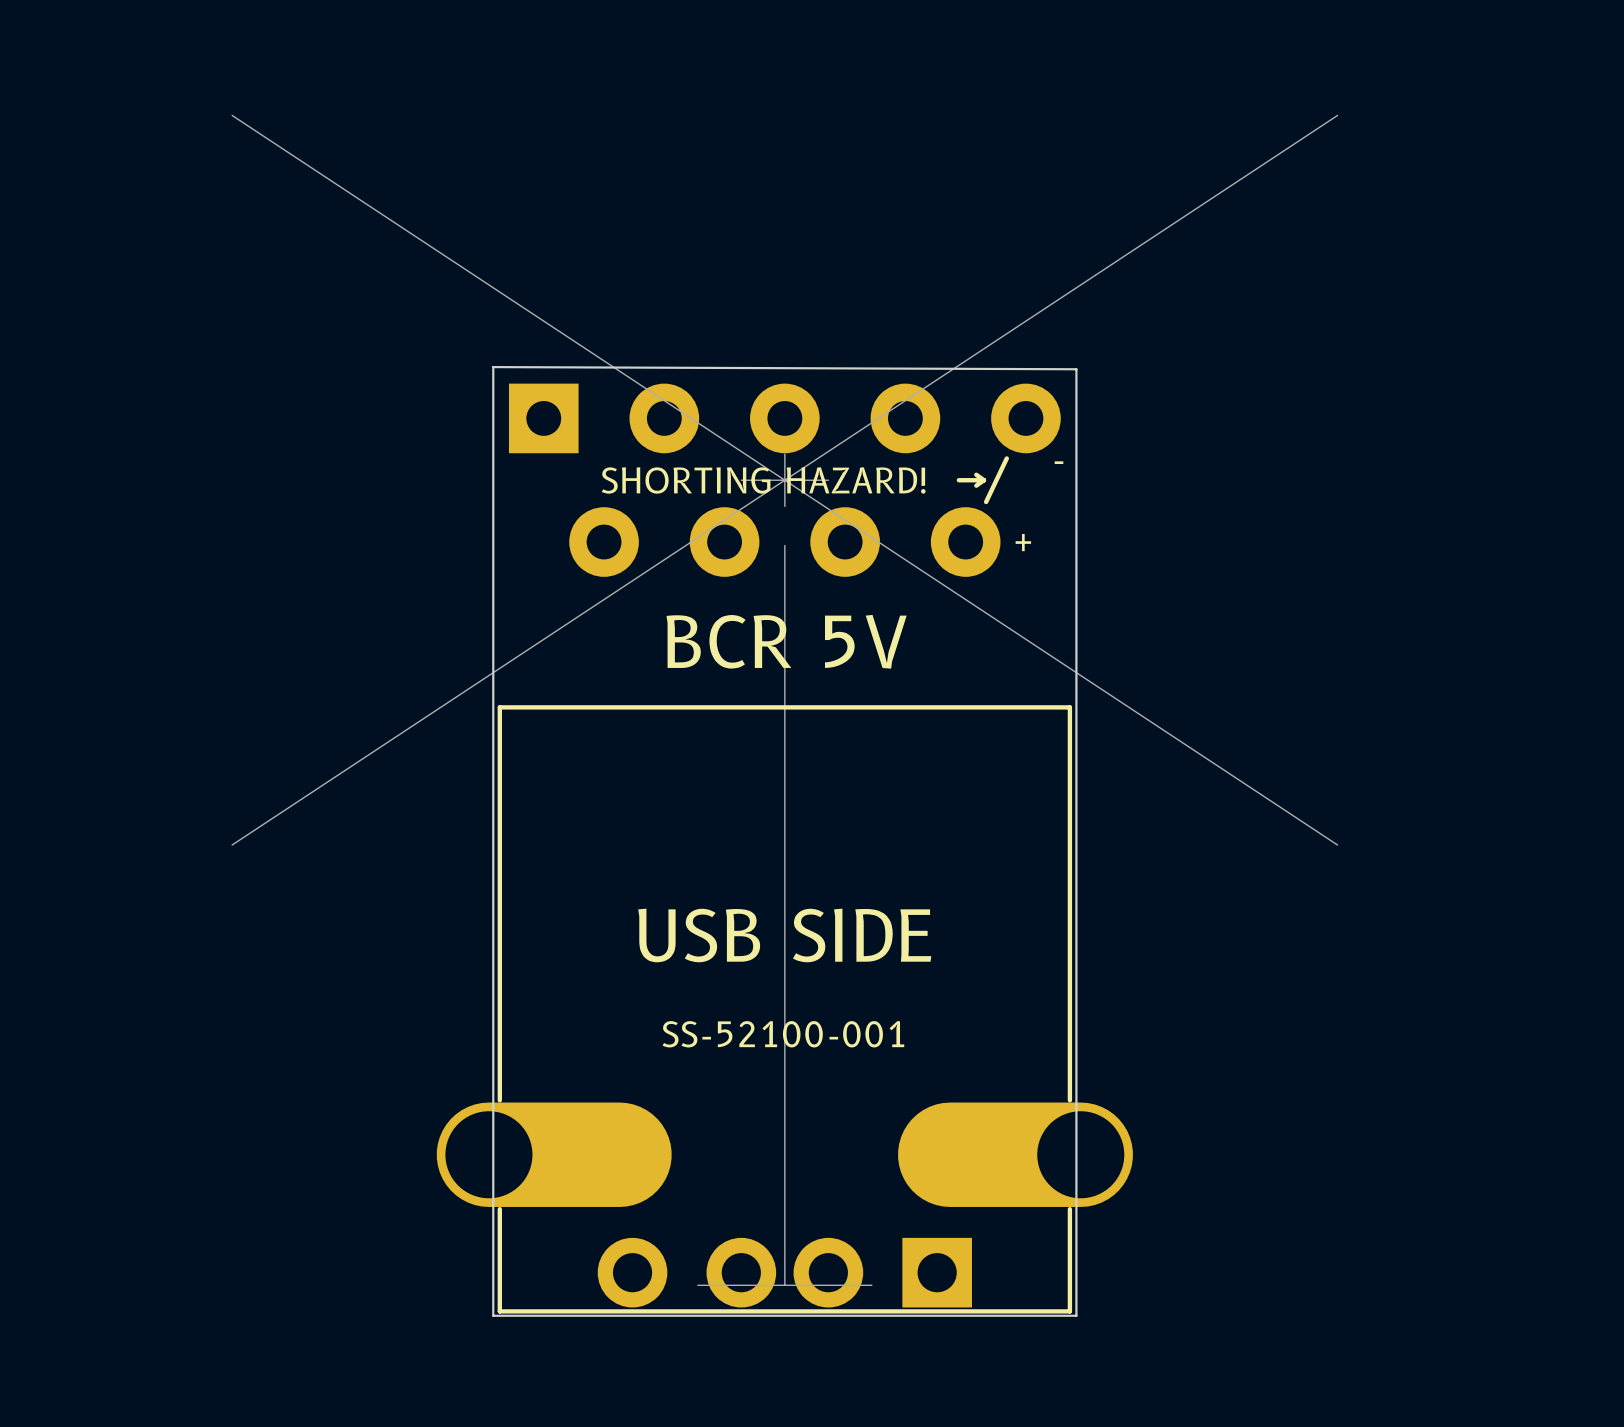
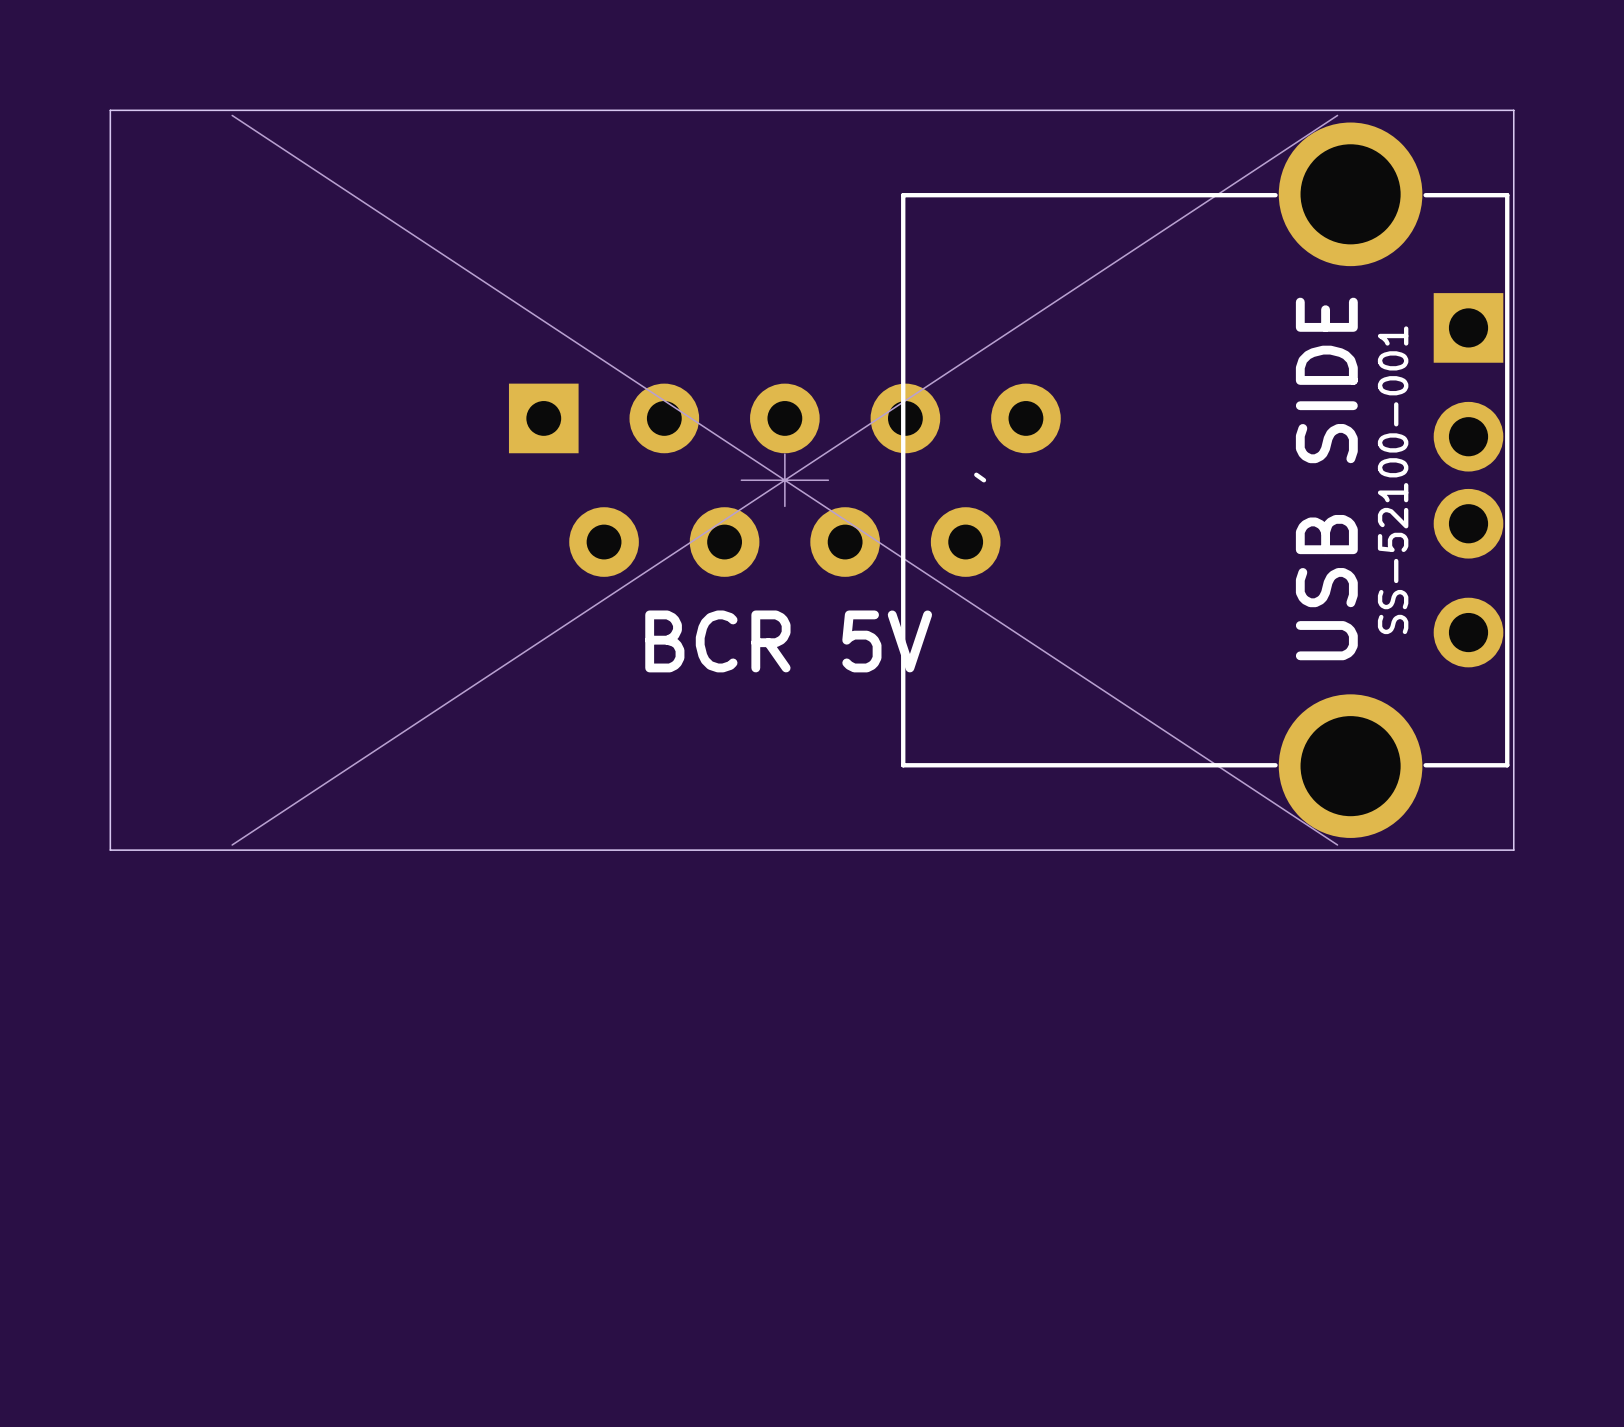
board edge: none -> (110, 110) (110, 850) (1513, 850) (1513, 110) (110, 110)
board edge: (493, 367) (493, 1315) (1076, 1315) (1076, 369) (493, 367) -> none
line: (1006, 458) (986, 501) -> none
text: - (1059, 462) -> none
text: SHORTING HAZARD! (763, 480) -> none
line: (958, 480) (983, 480) (976, 485) -> none
part: none -> (1205, 480)
text: + (1023, 542) -> none
line: (784, 545) (784, 1285) -> none
text rotation: 0° (784, 935) -> 90° counterclockwise (1326, 478)
text position: USB SIDE (784, 935) -> USB SIDE (1326, 478)
part: (784, 1009) -> none
text rotation: 0° (783, 1034) -> 90° counterclockwise (1393, 480)
text position: SS-52100-001 (783, 1034) -> SS-52100-001 (1393, 480)
line: (697, 1285) (871, 1285) -> none

